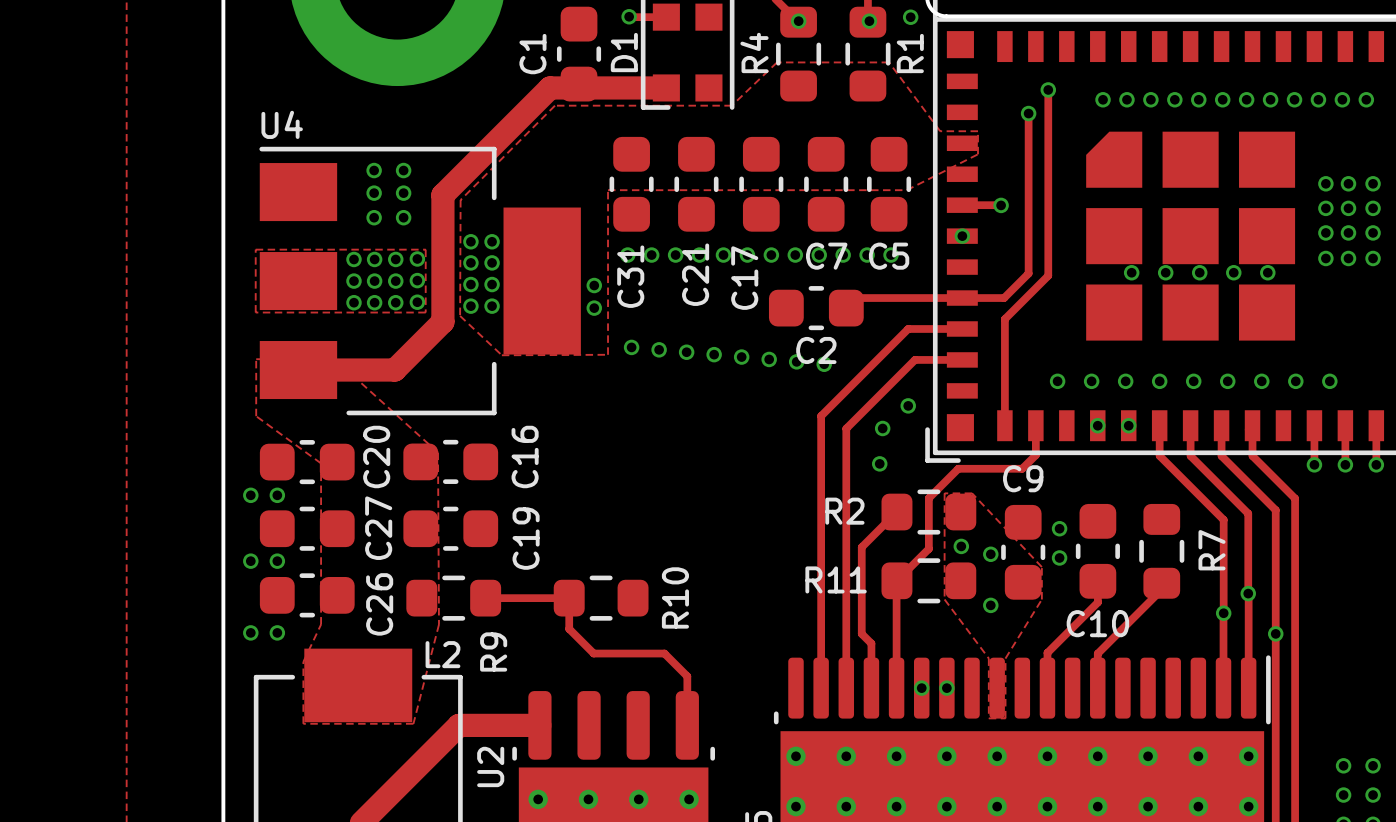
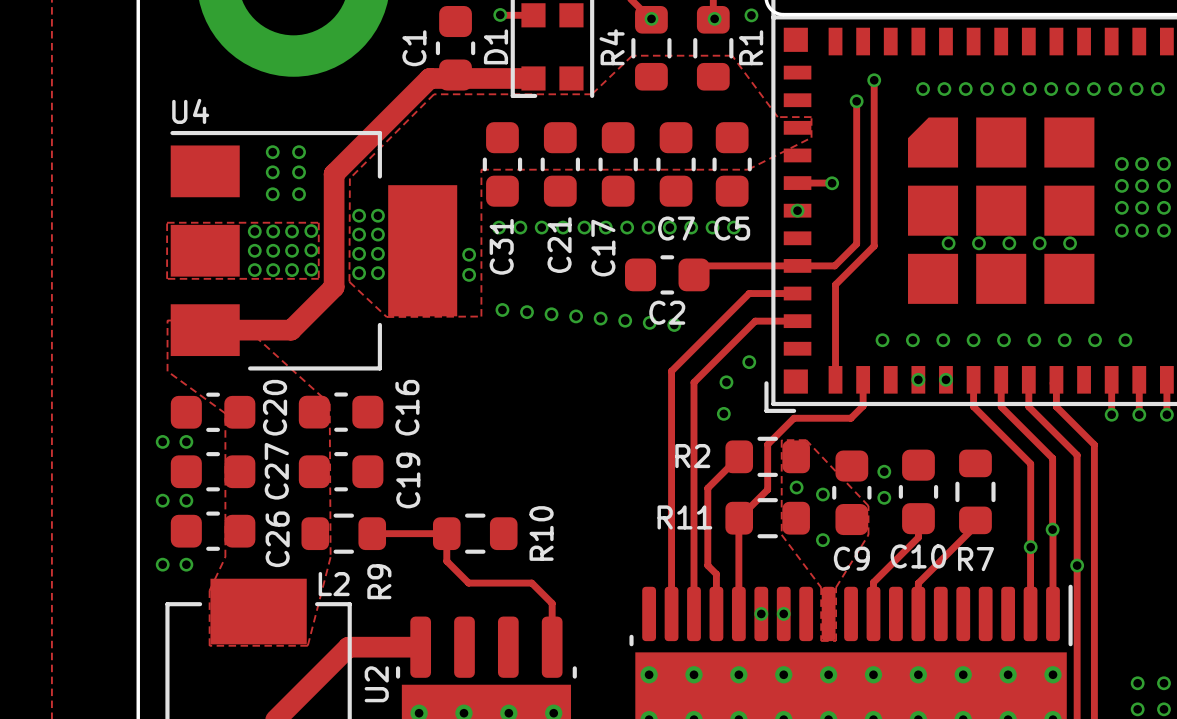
C9 name position: C9 (1023, 478) -> C9 (851, 558)
R7 name rotation: 0° (1212, 550) -> 90° clockwise (976, 559)
R7 name position: R7 (1212, 550) -> R7 (976, 559)

